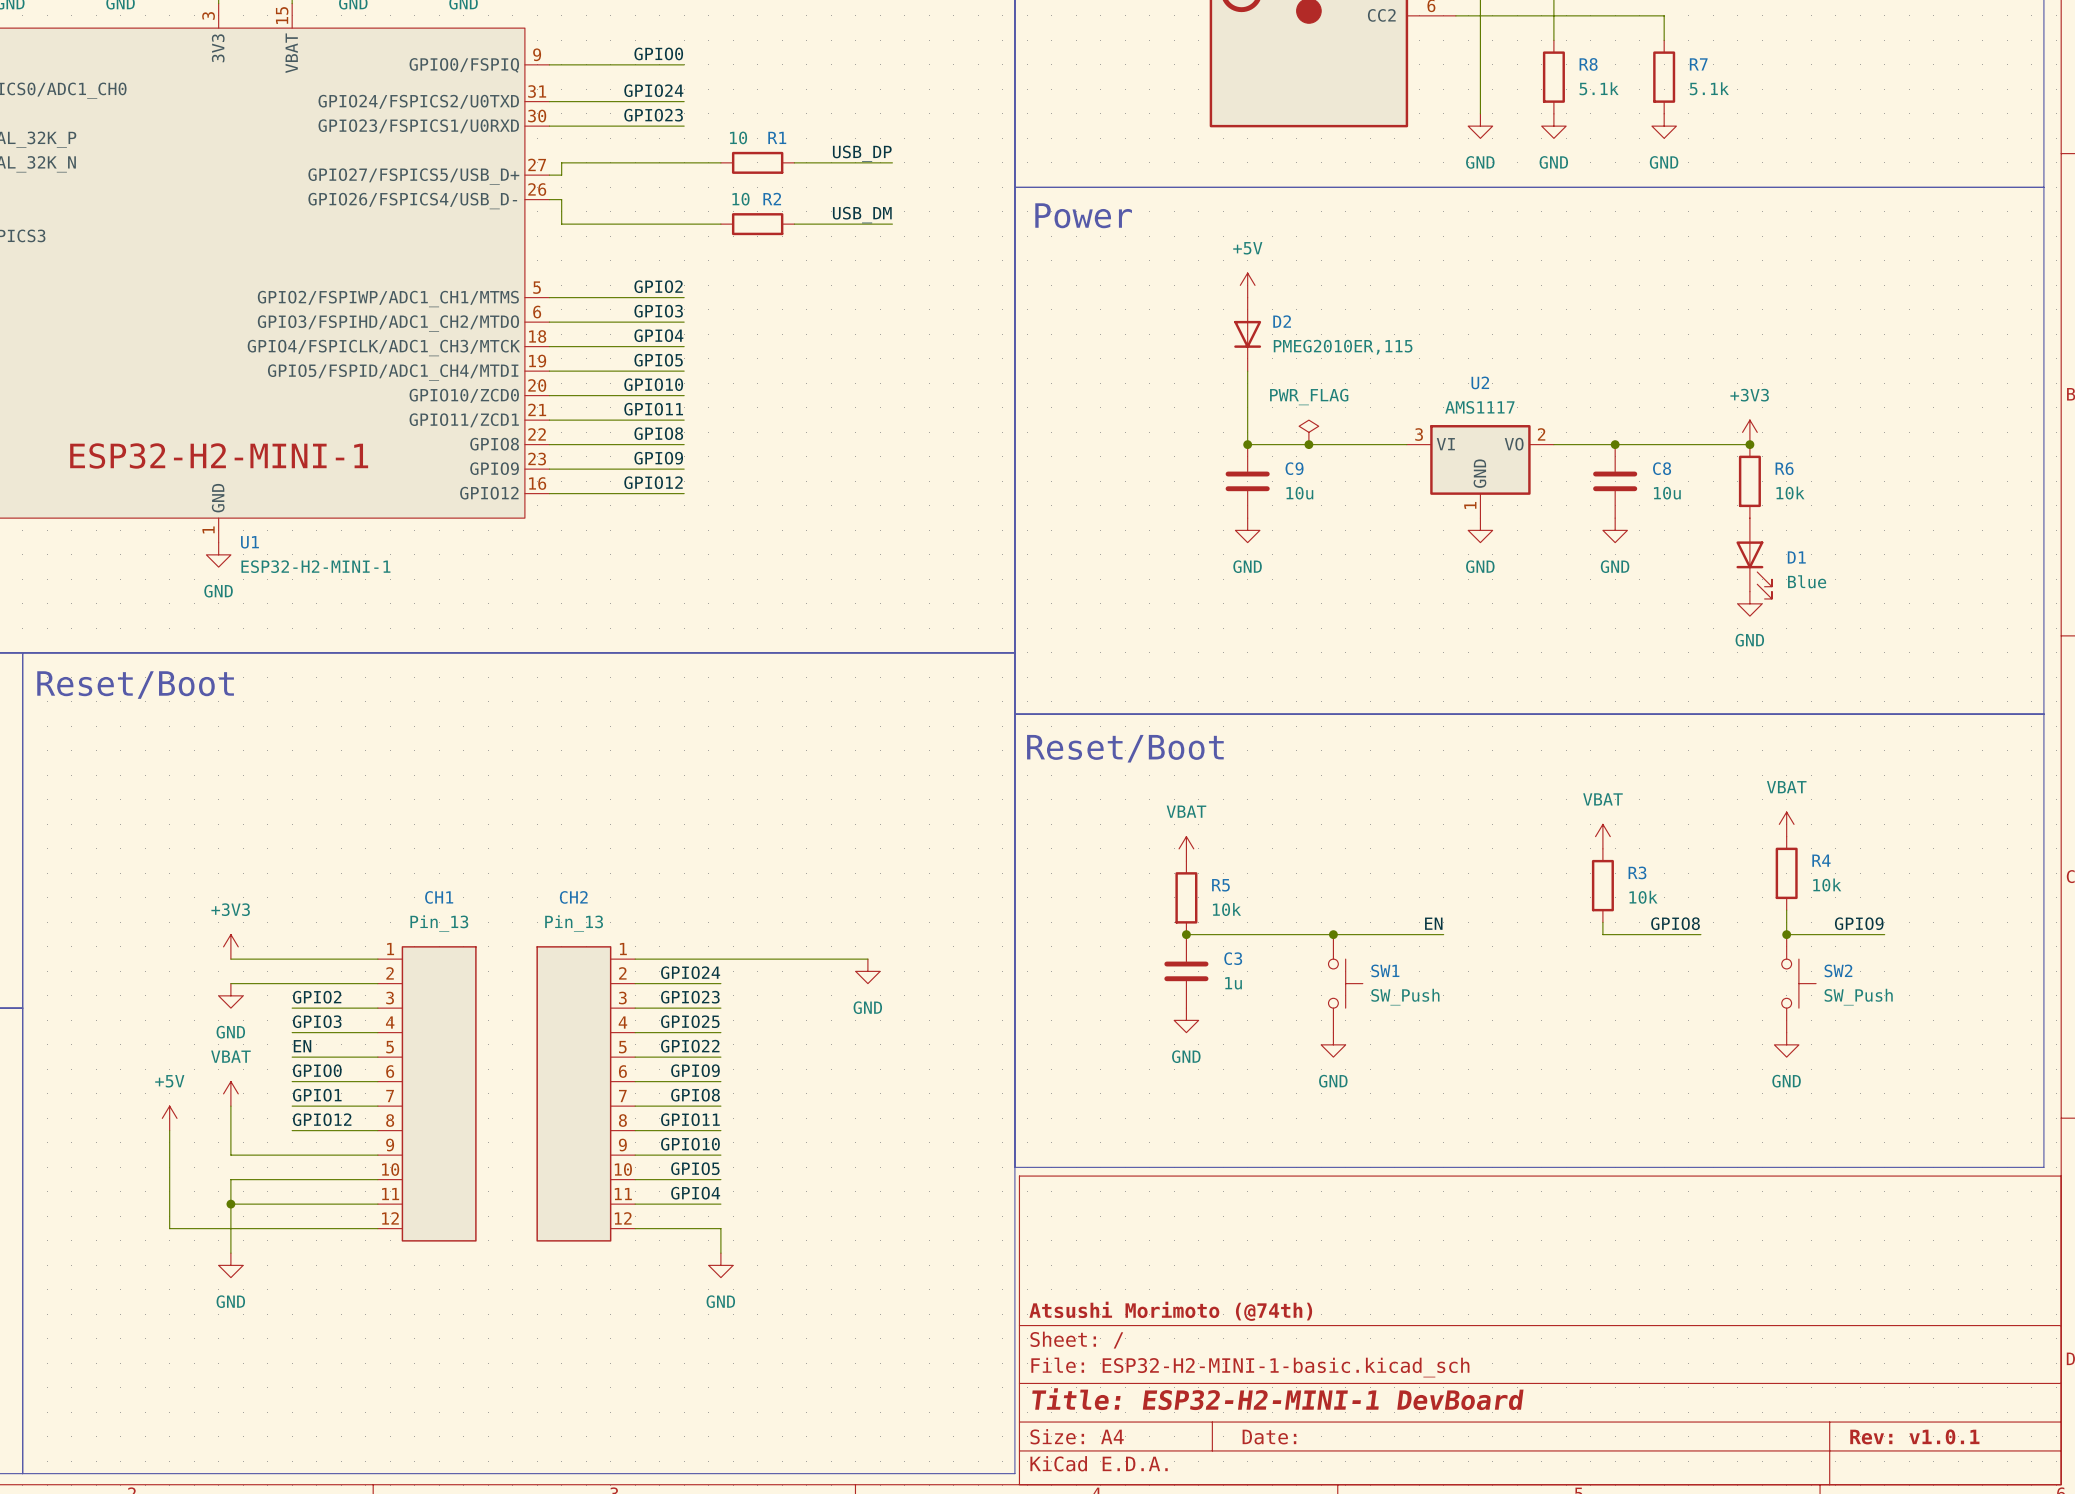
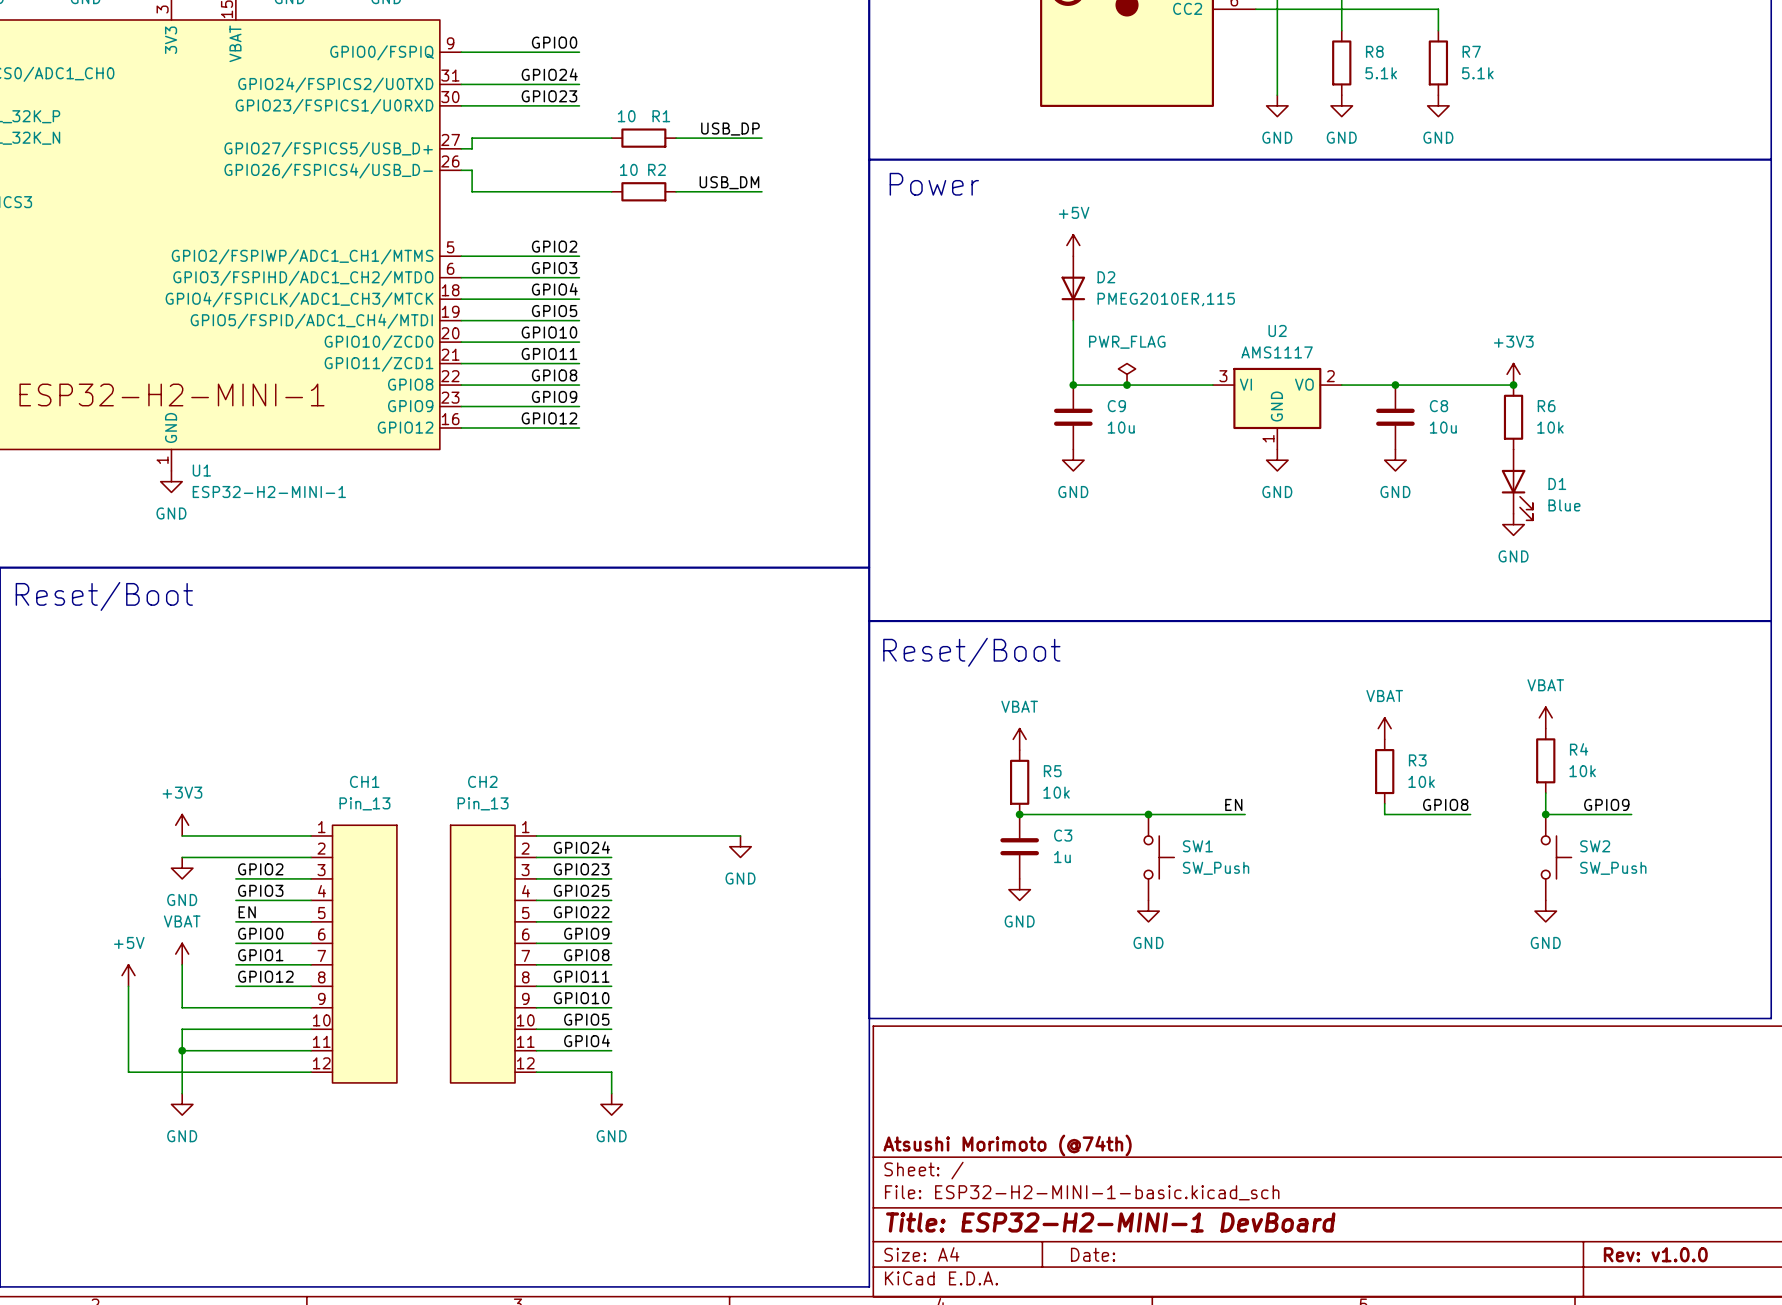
title block: Rev: v1.0.1 (1914, 1436) -> Rev: v1.0.0 (1655, 1254)

